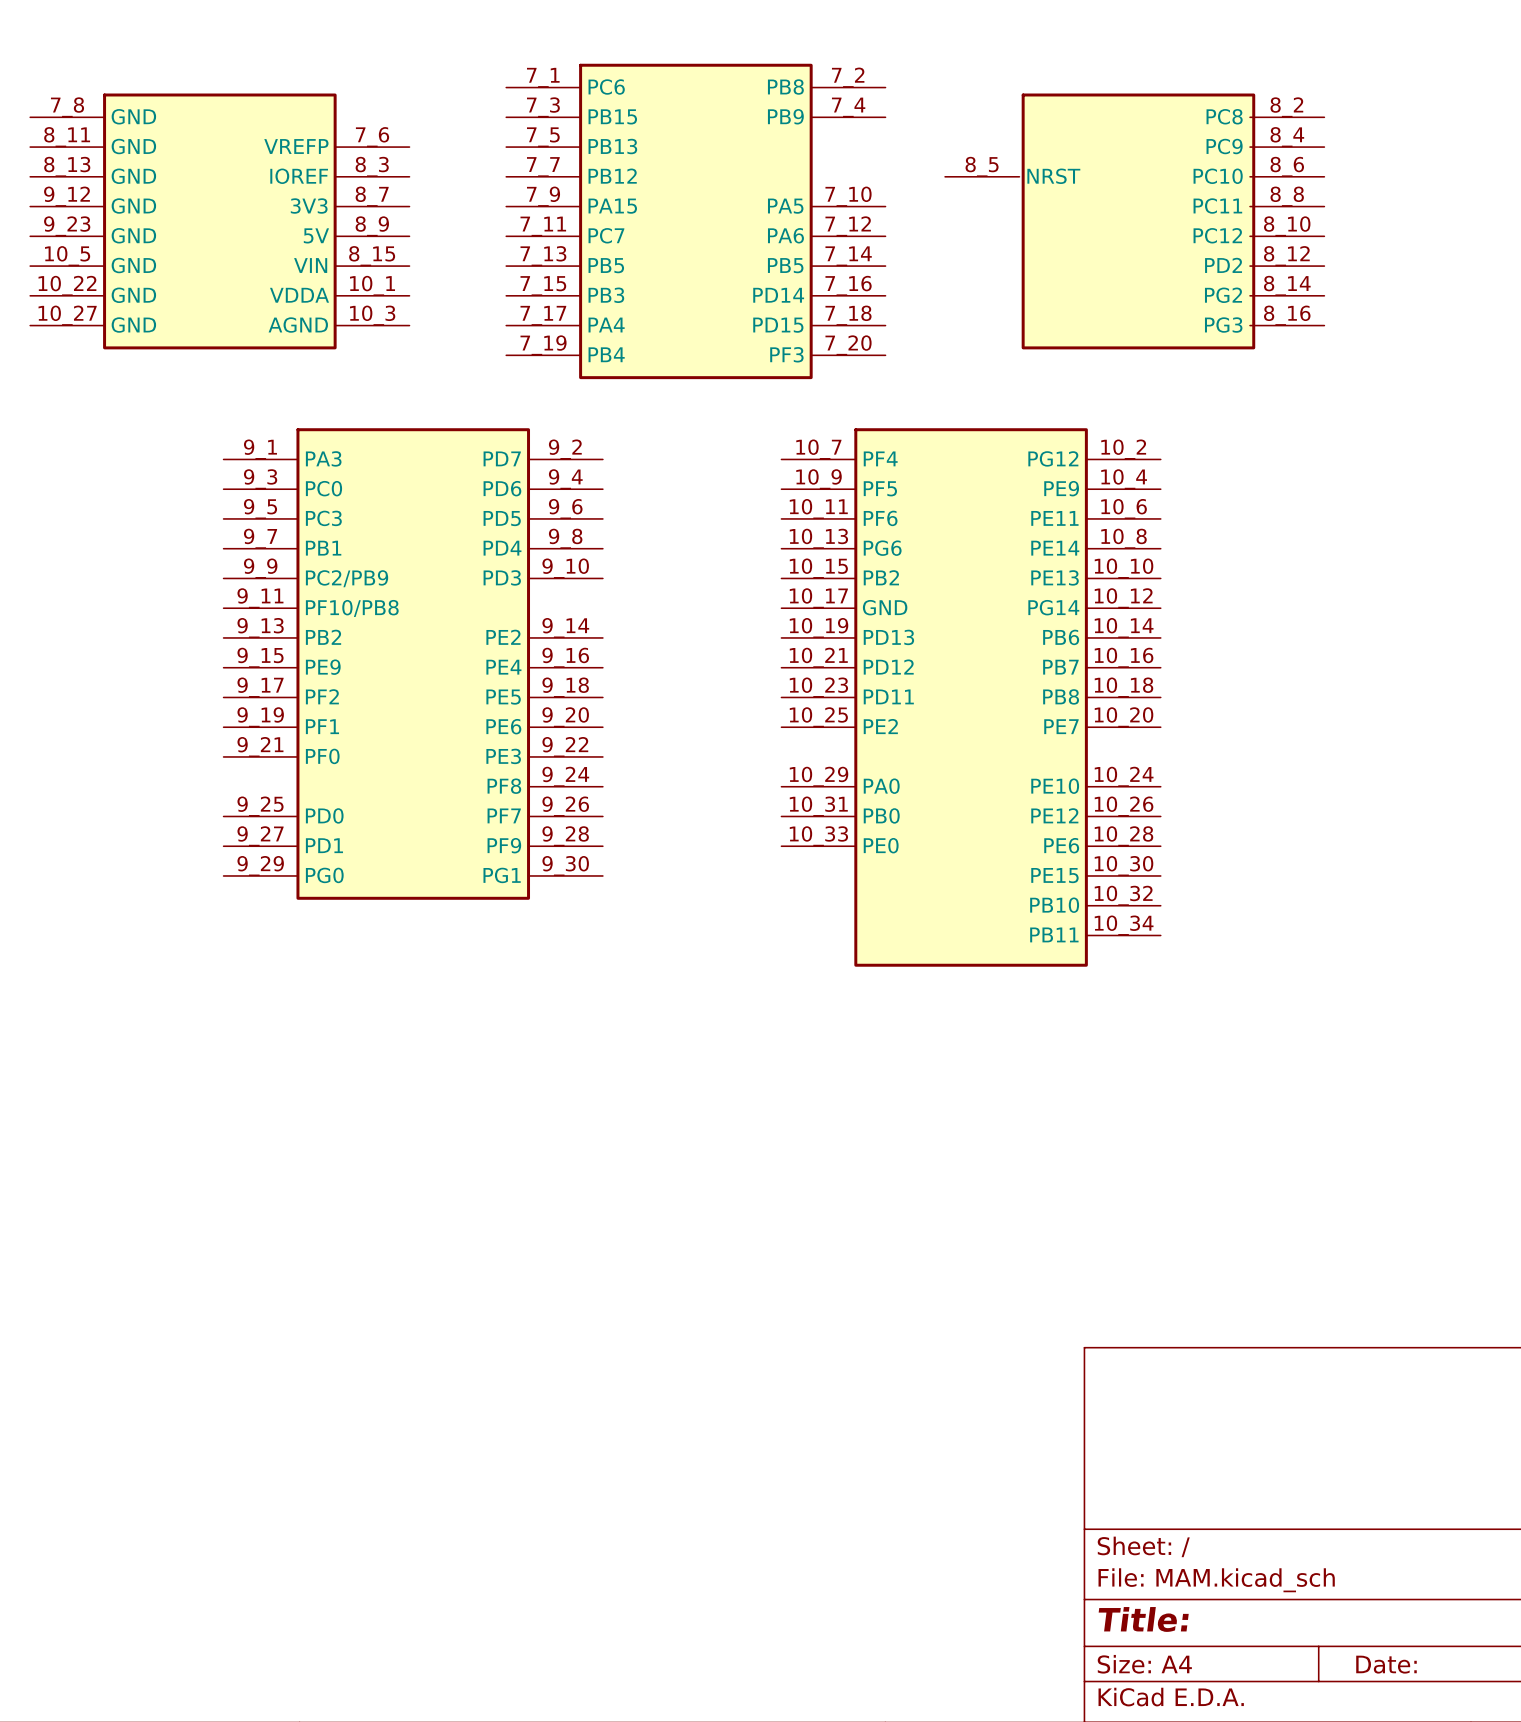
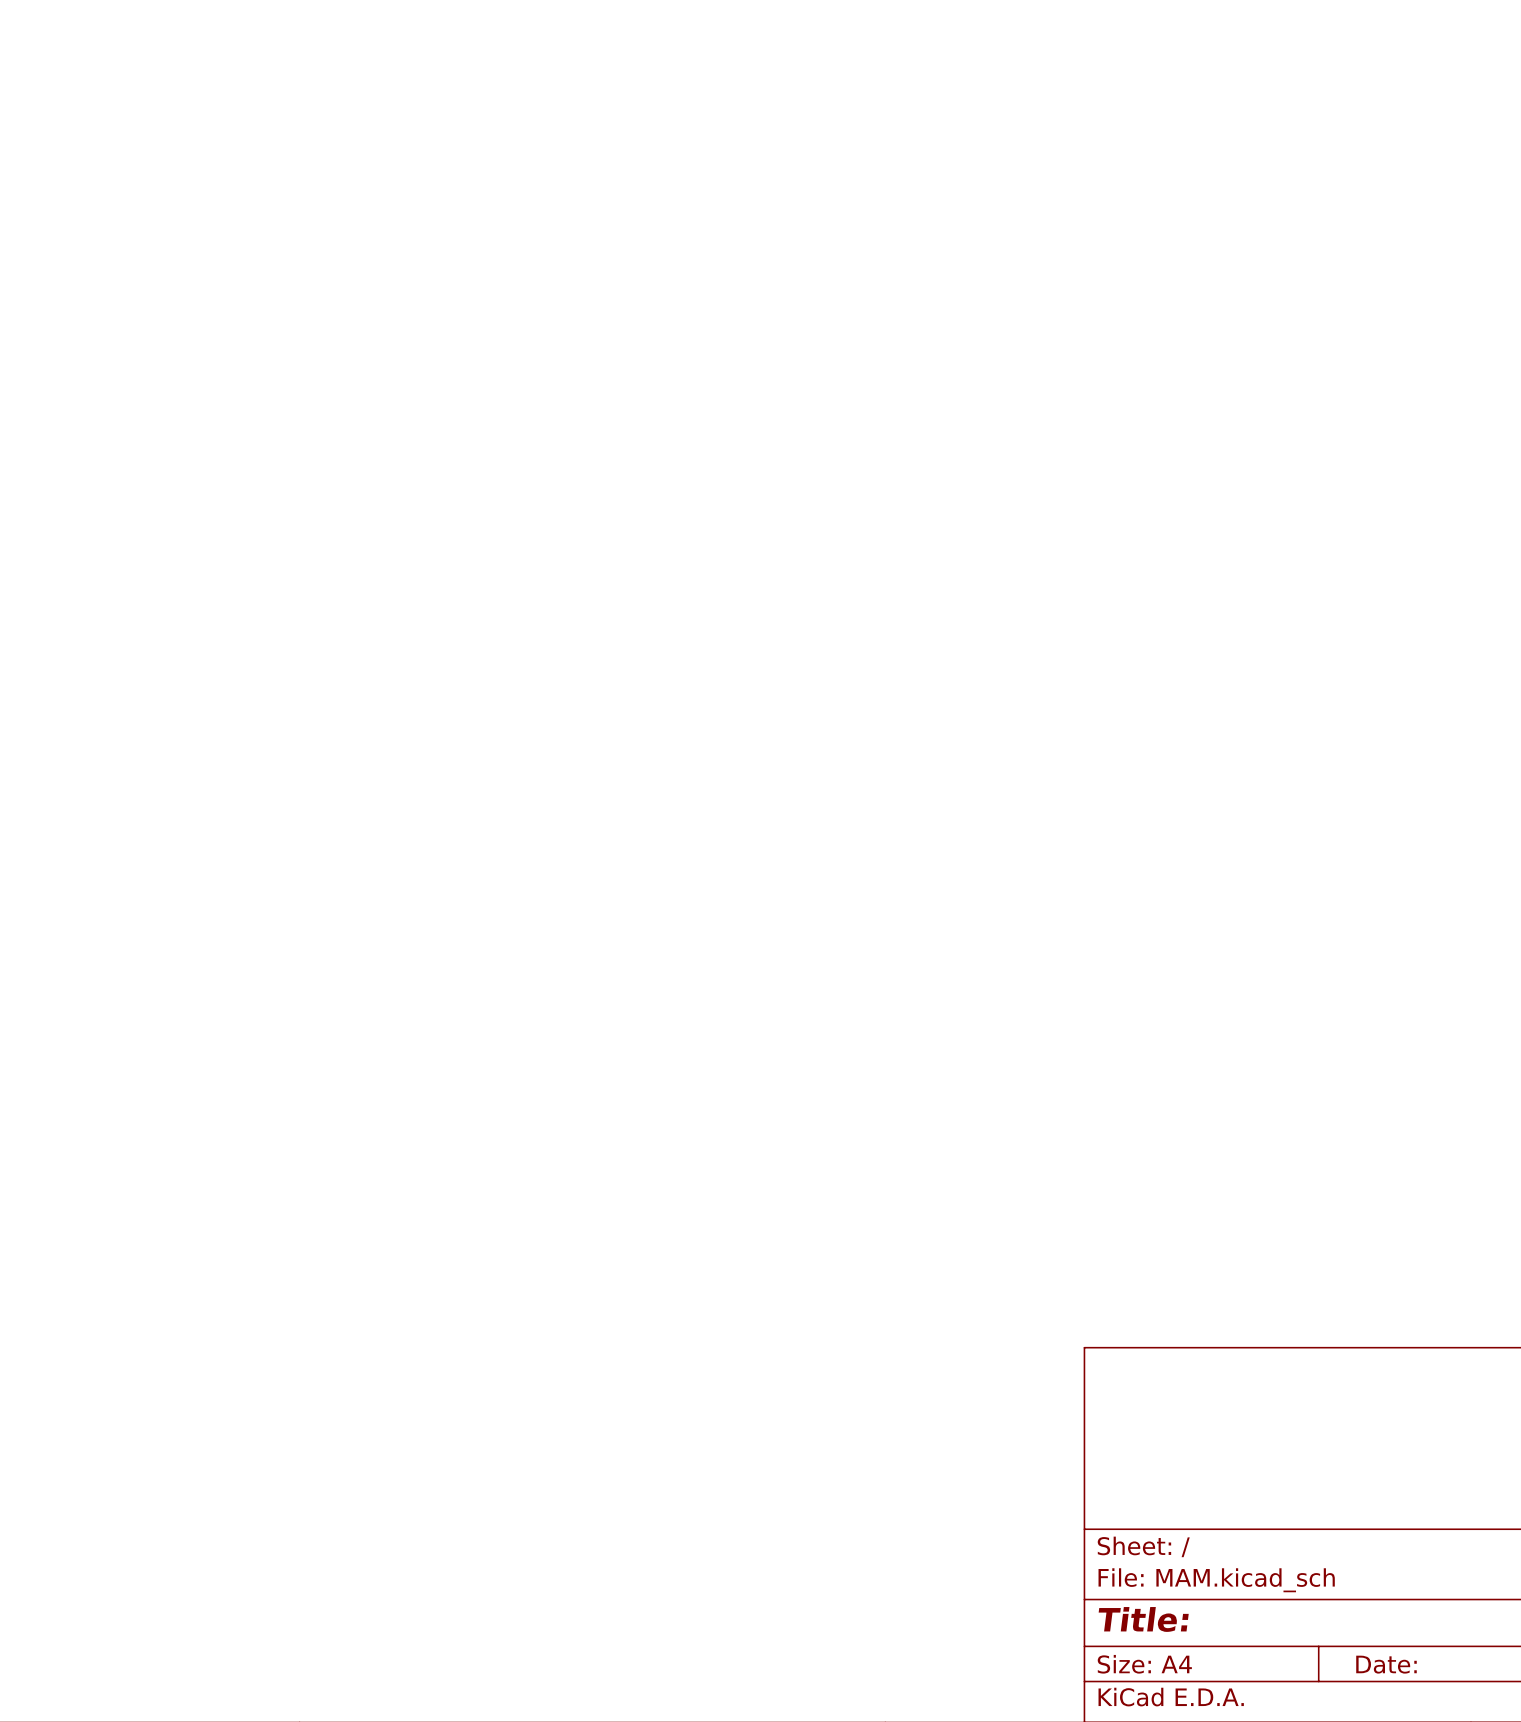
part: (219, 221) -> none
part: (695, 221) -> none
part: (1134, 221) -> none
part: (413, 664) -> none
part: (971, 697) -> none

